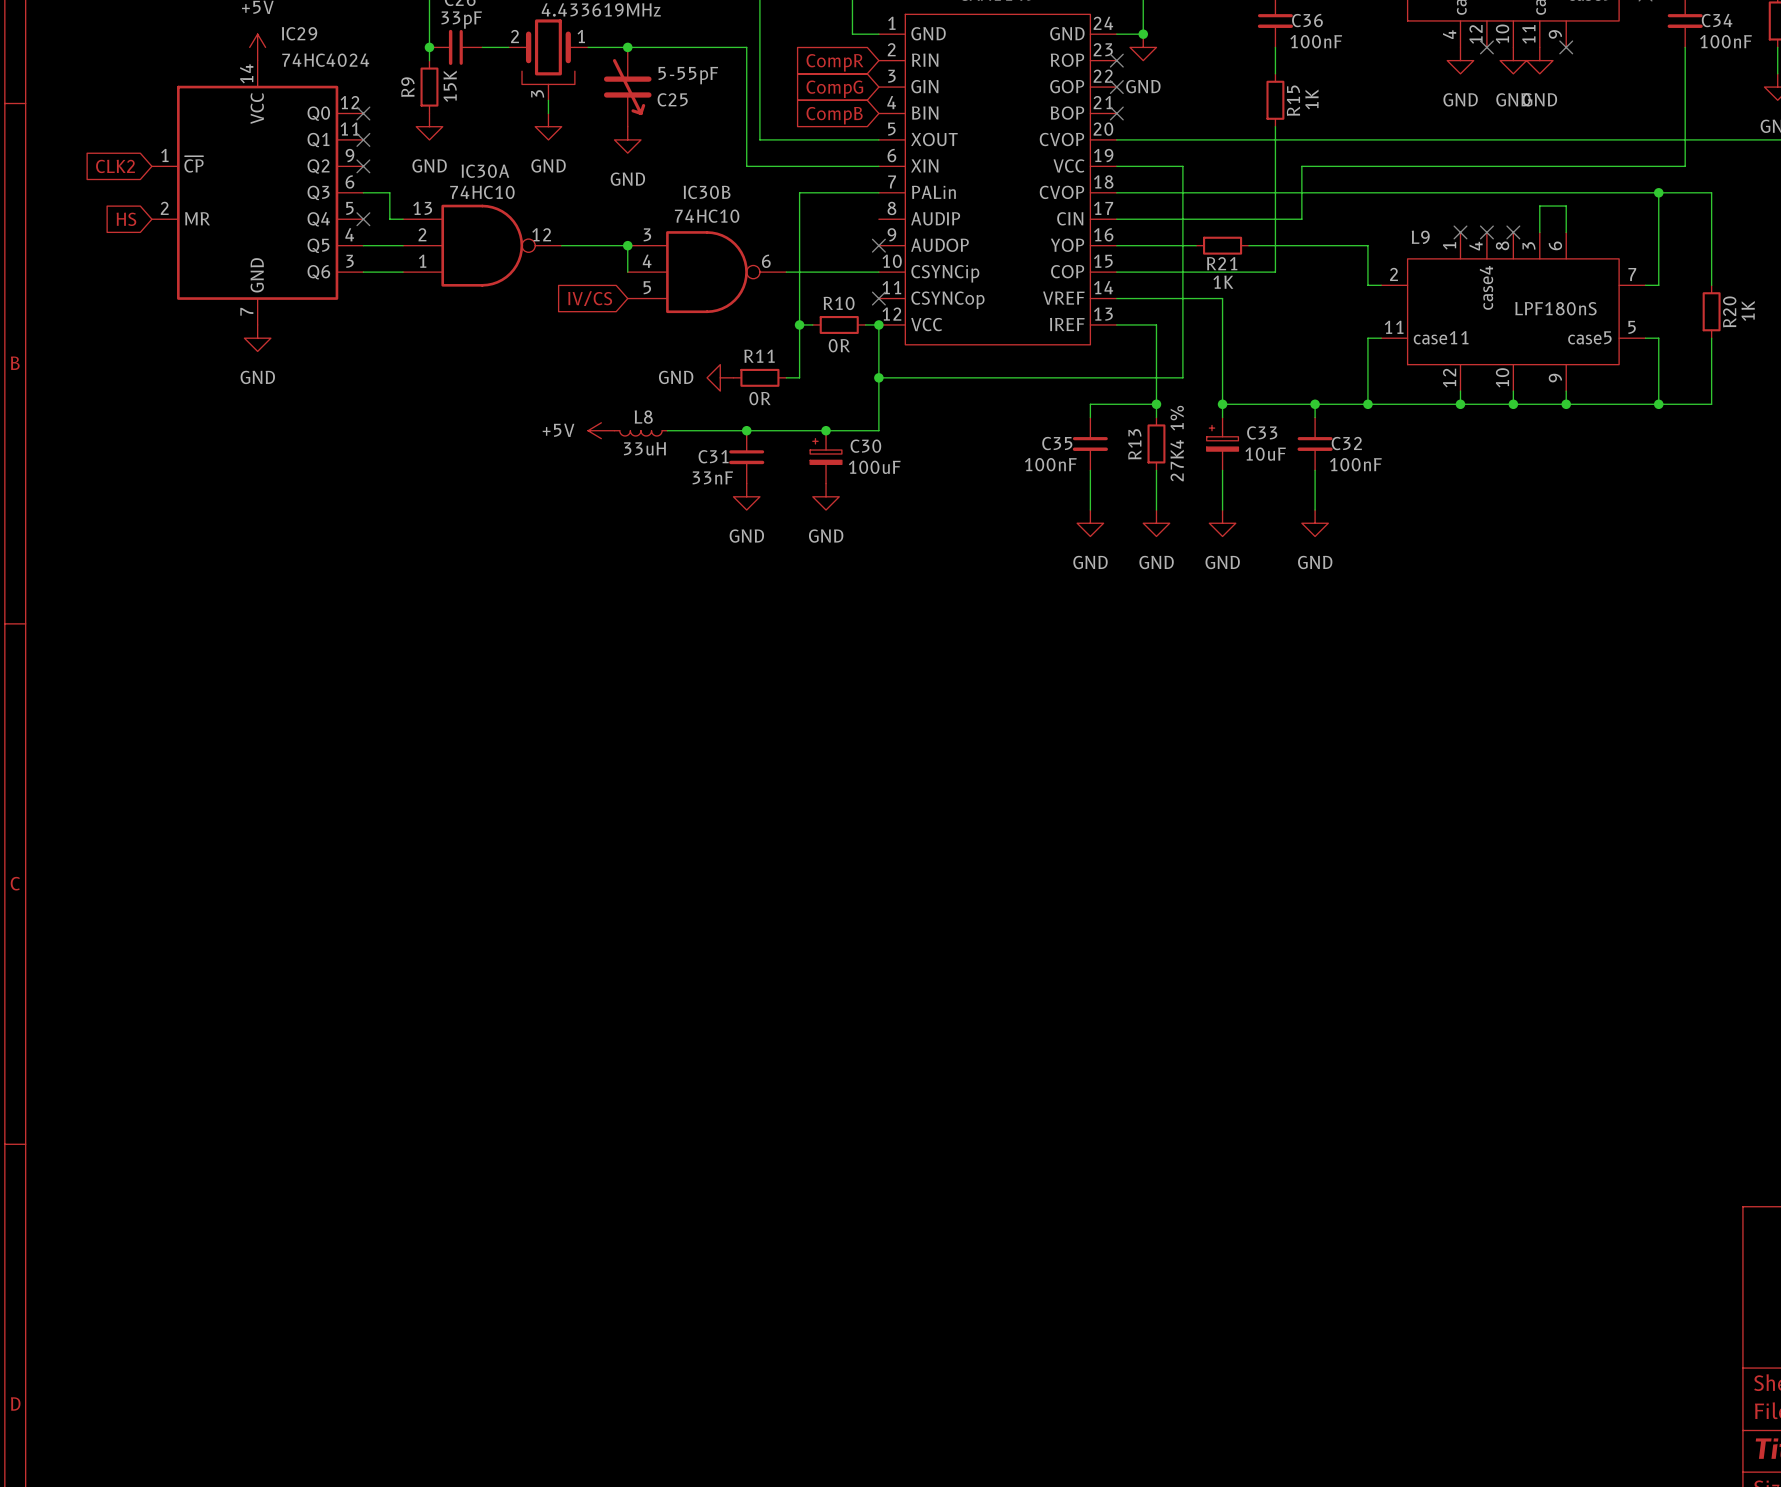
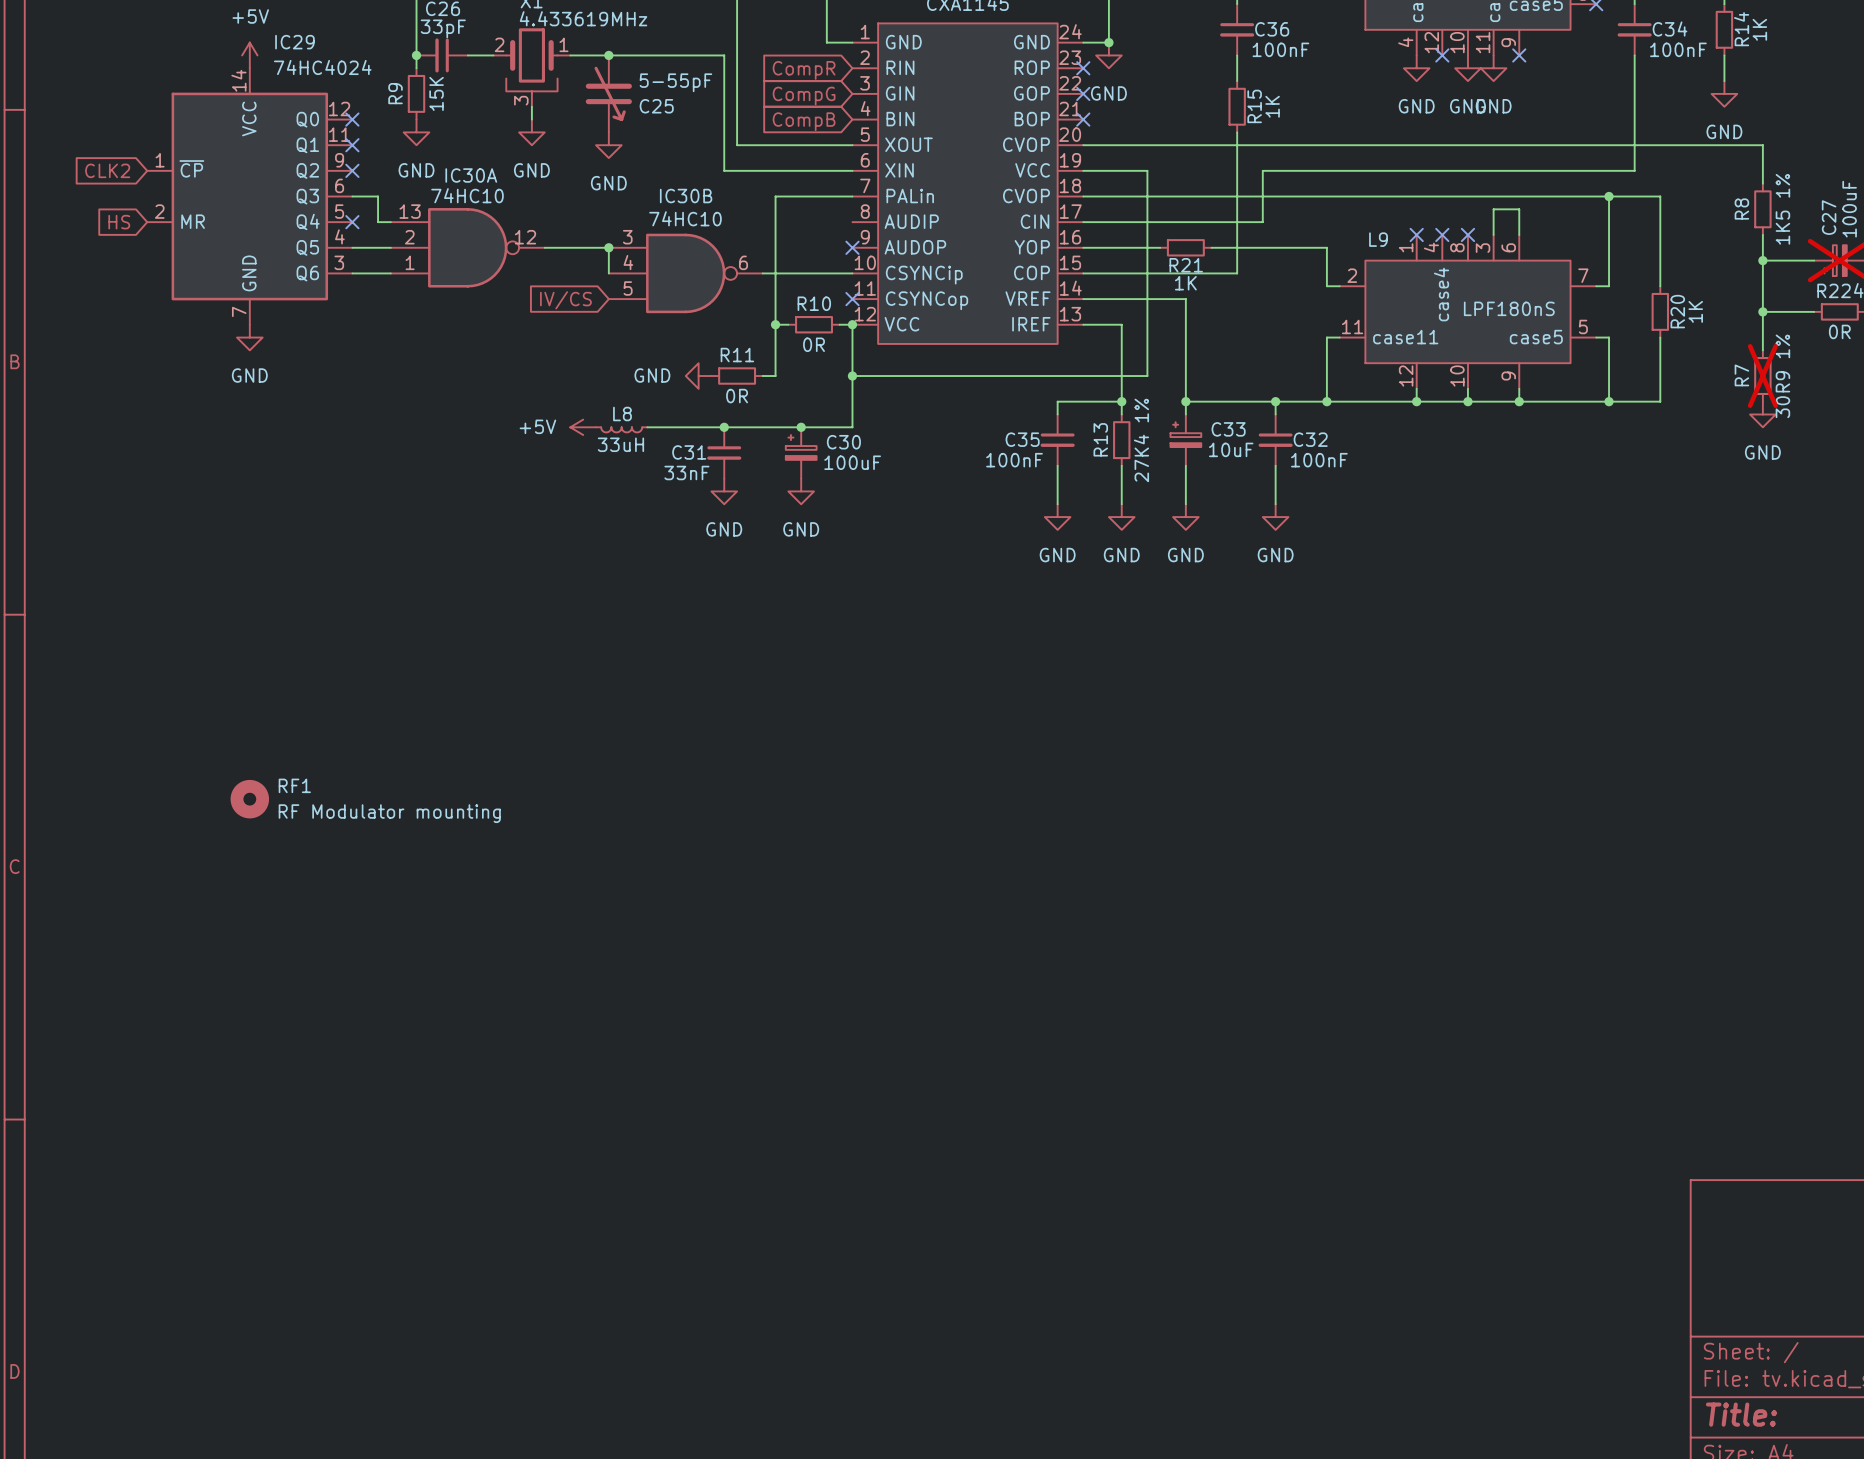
RF1: none -> RF Modulator mounting (249, 799)

